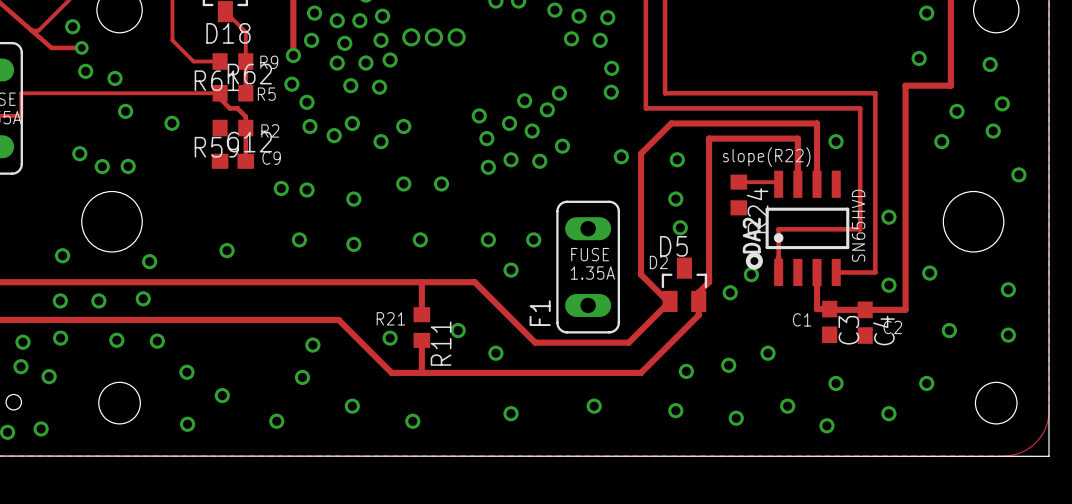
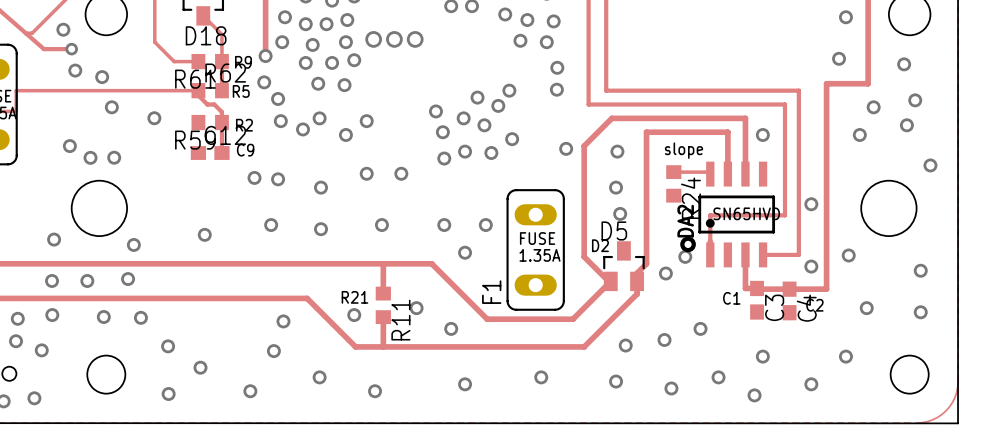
text: slope(R22) (766, 157) -> slope (683, 150)
text rotation: 0° (858, 225) -> 90° clockwise (746, 213)

